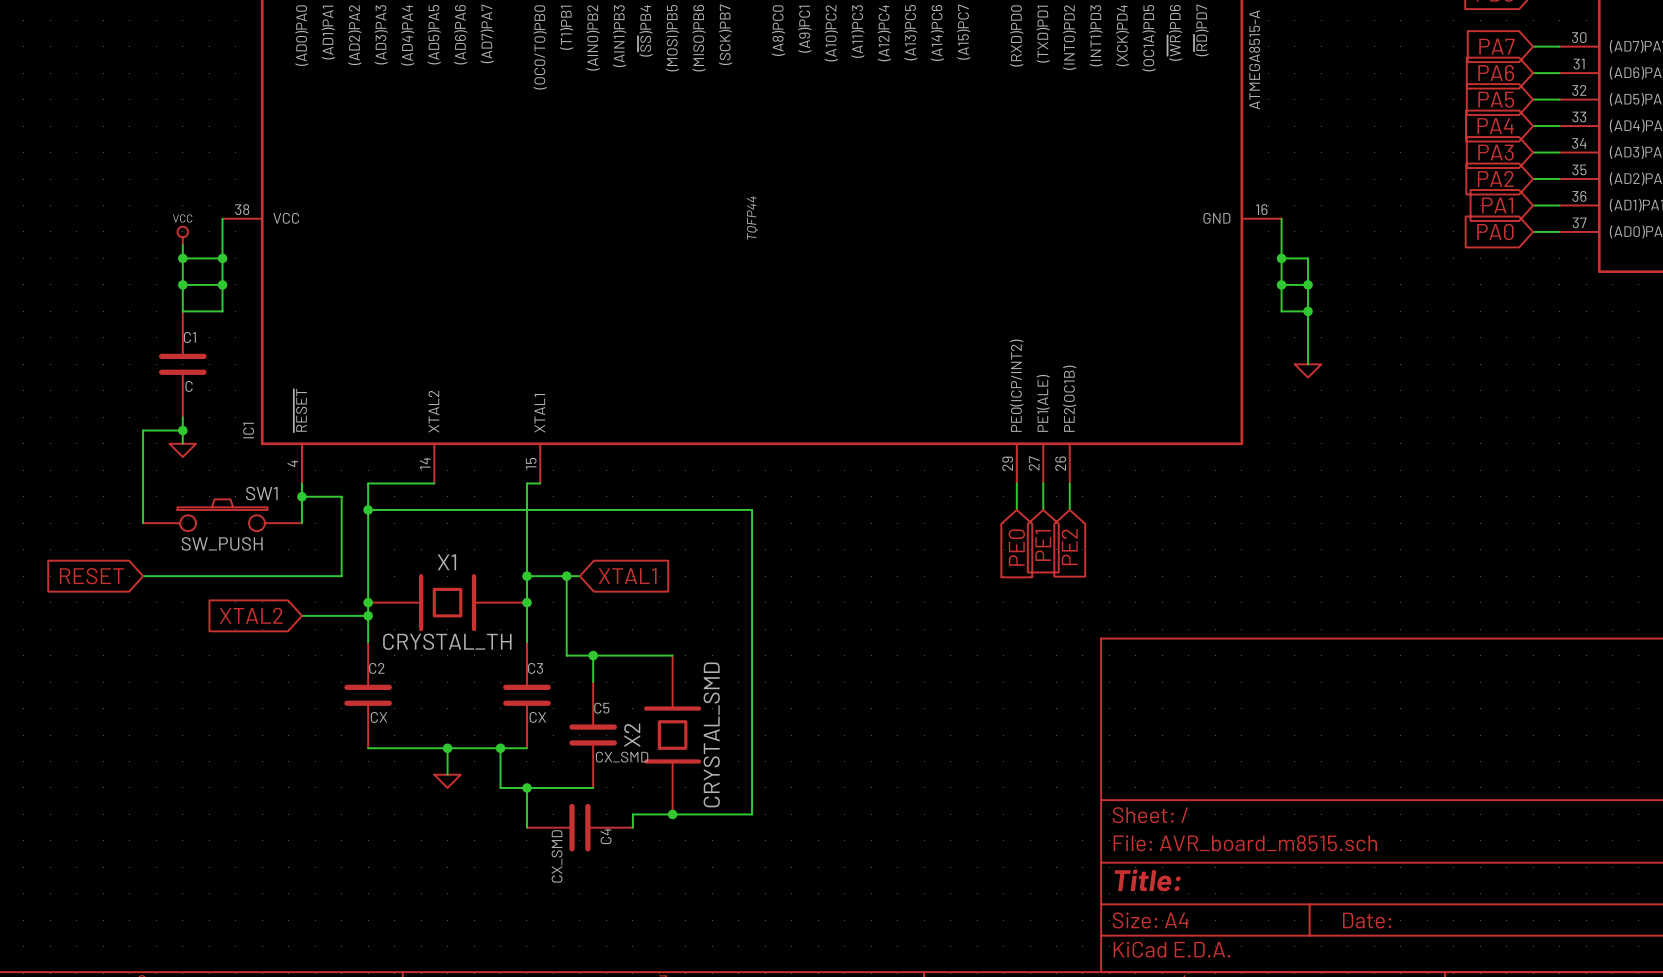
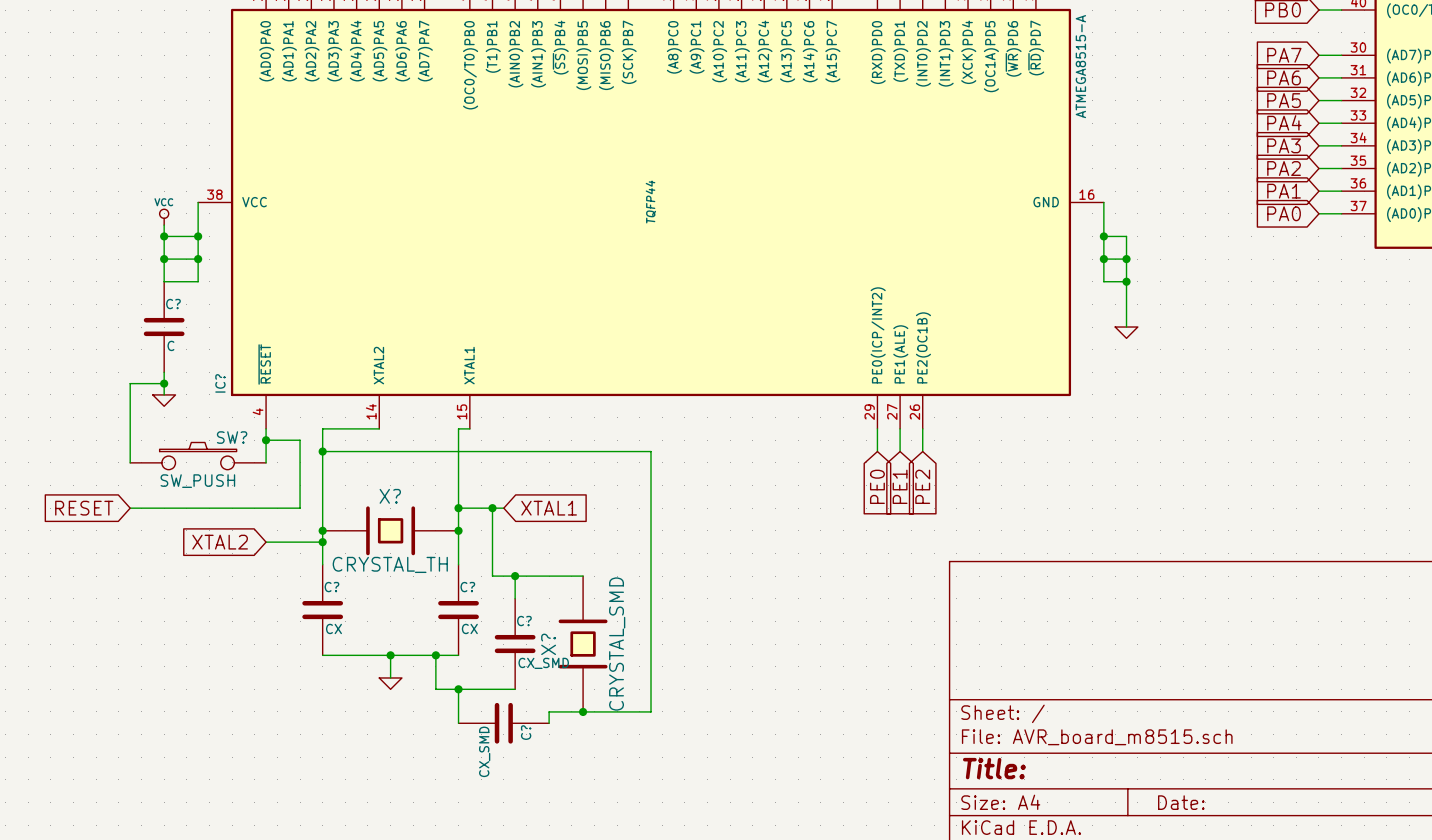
C1 name: C1 (189, 337) -> C? (173, 304)
IC1 name: IC1 (248, 430) -> IC? (220, 383)
SW1 name: SW1 (261, 493) -> SW? (232, 437)
X1 name: X1 (446, 562) -> X? (390, 496)
C2 name: C2 (376, 668) -> C? (331, 587)
C3 name: C3 (535, 668) -> C? (467, 587)
C5 name: C5 (601, 708) -> C? (524, 621)
X2 name: X2 (632, 735) -> X? (548, 644)
C4 name: C4 (606, 836) -> C? (526, 732)

